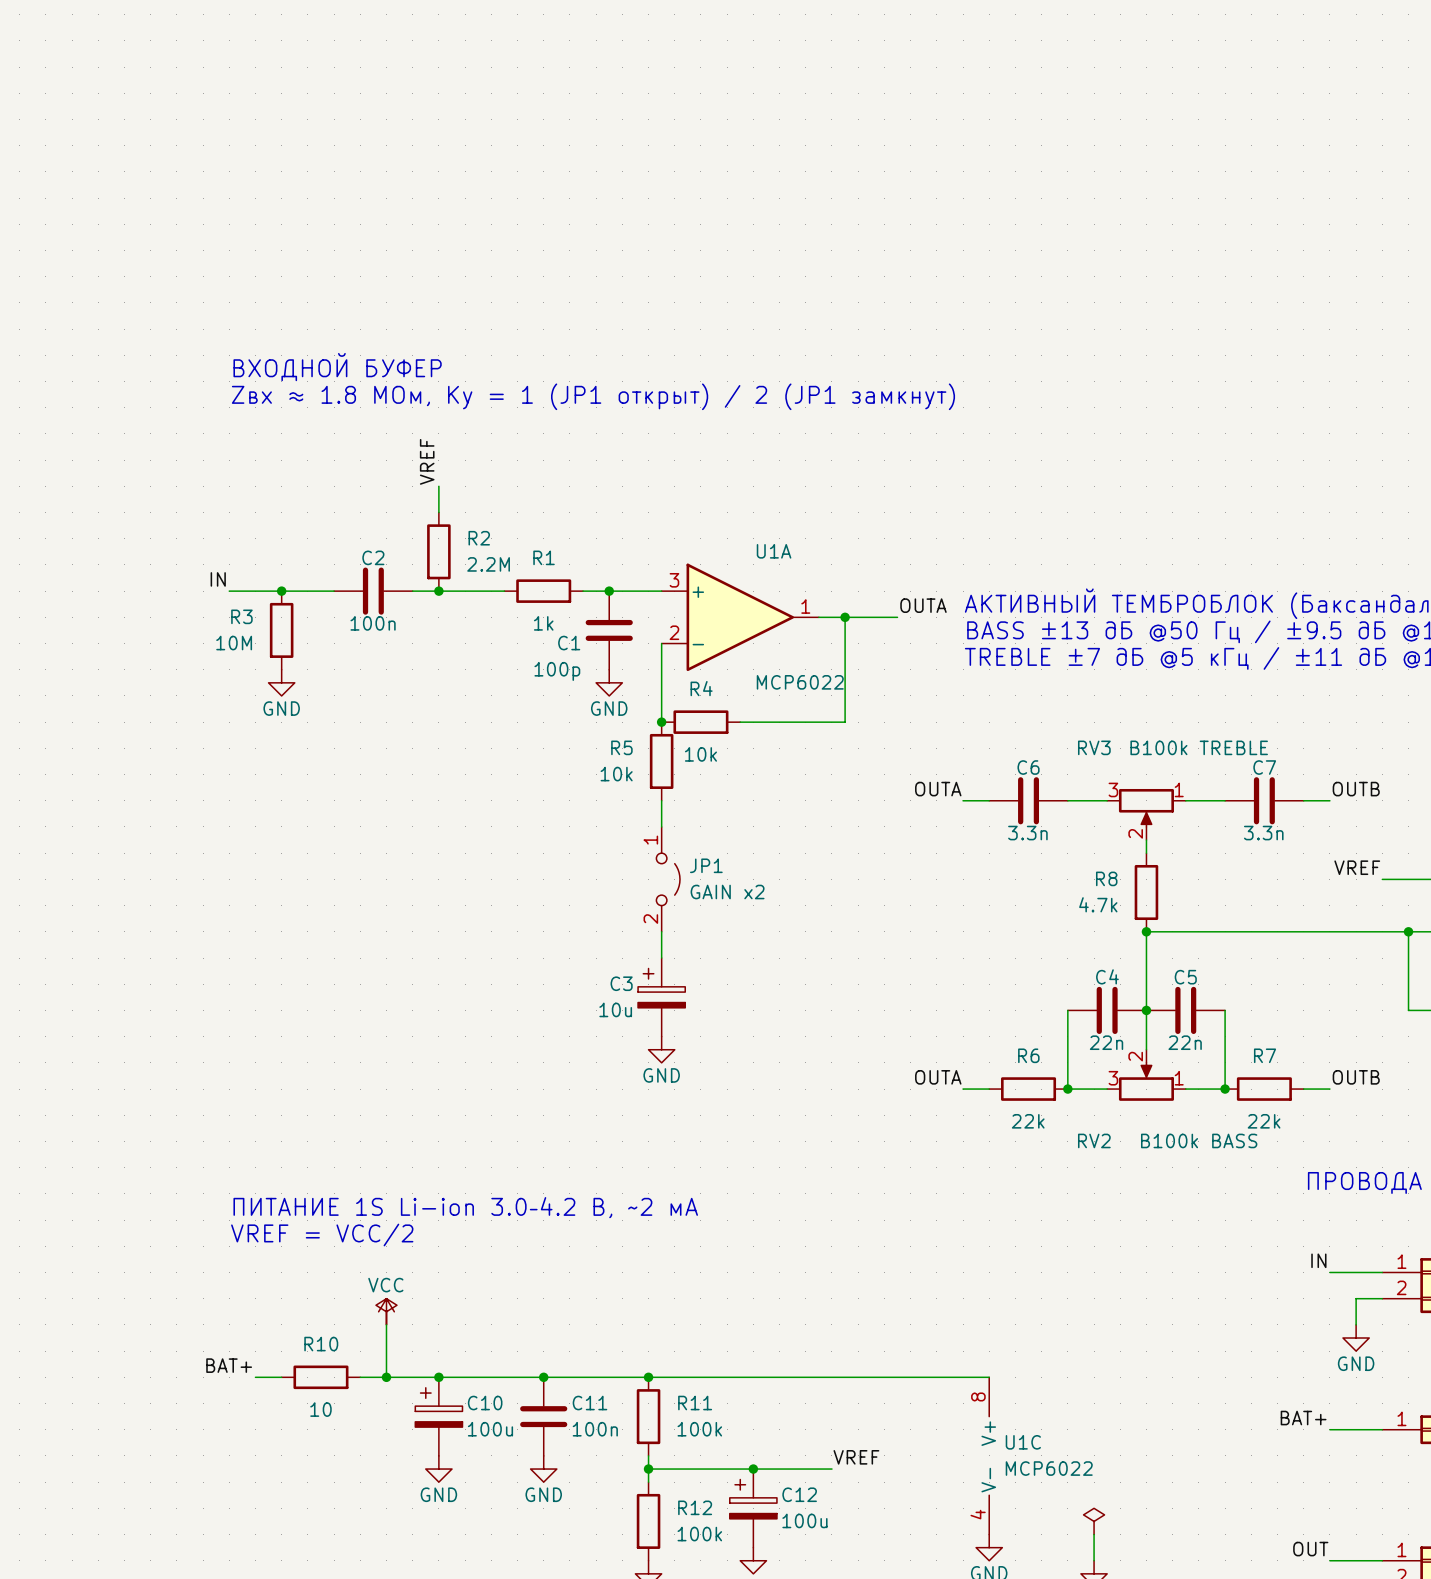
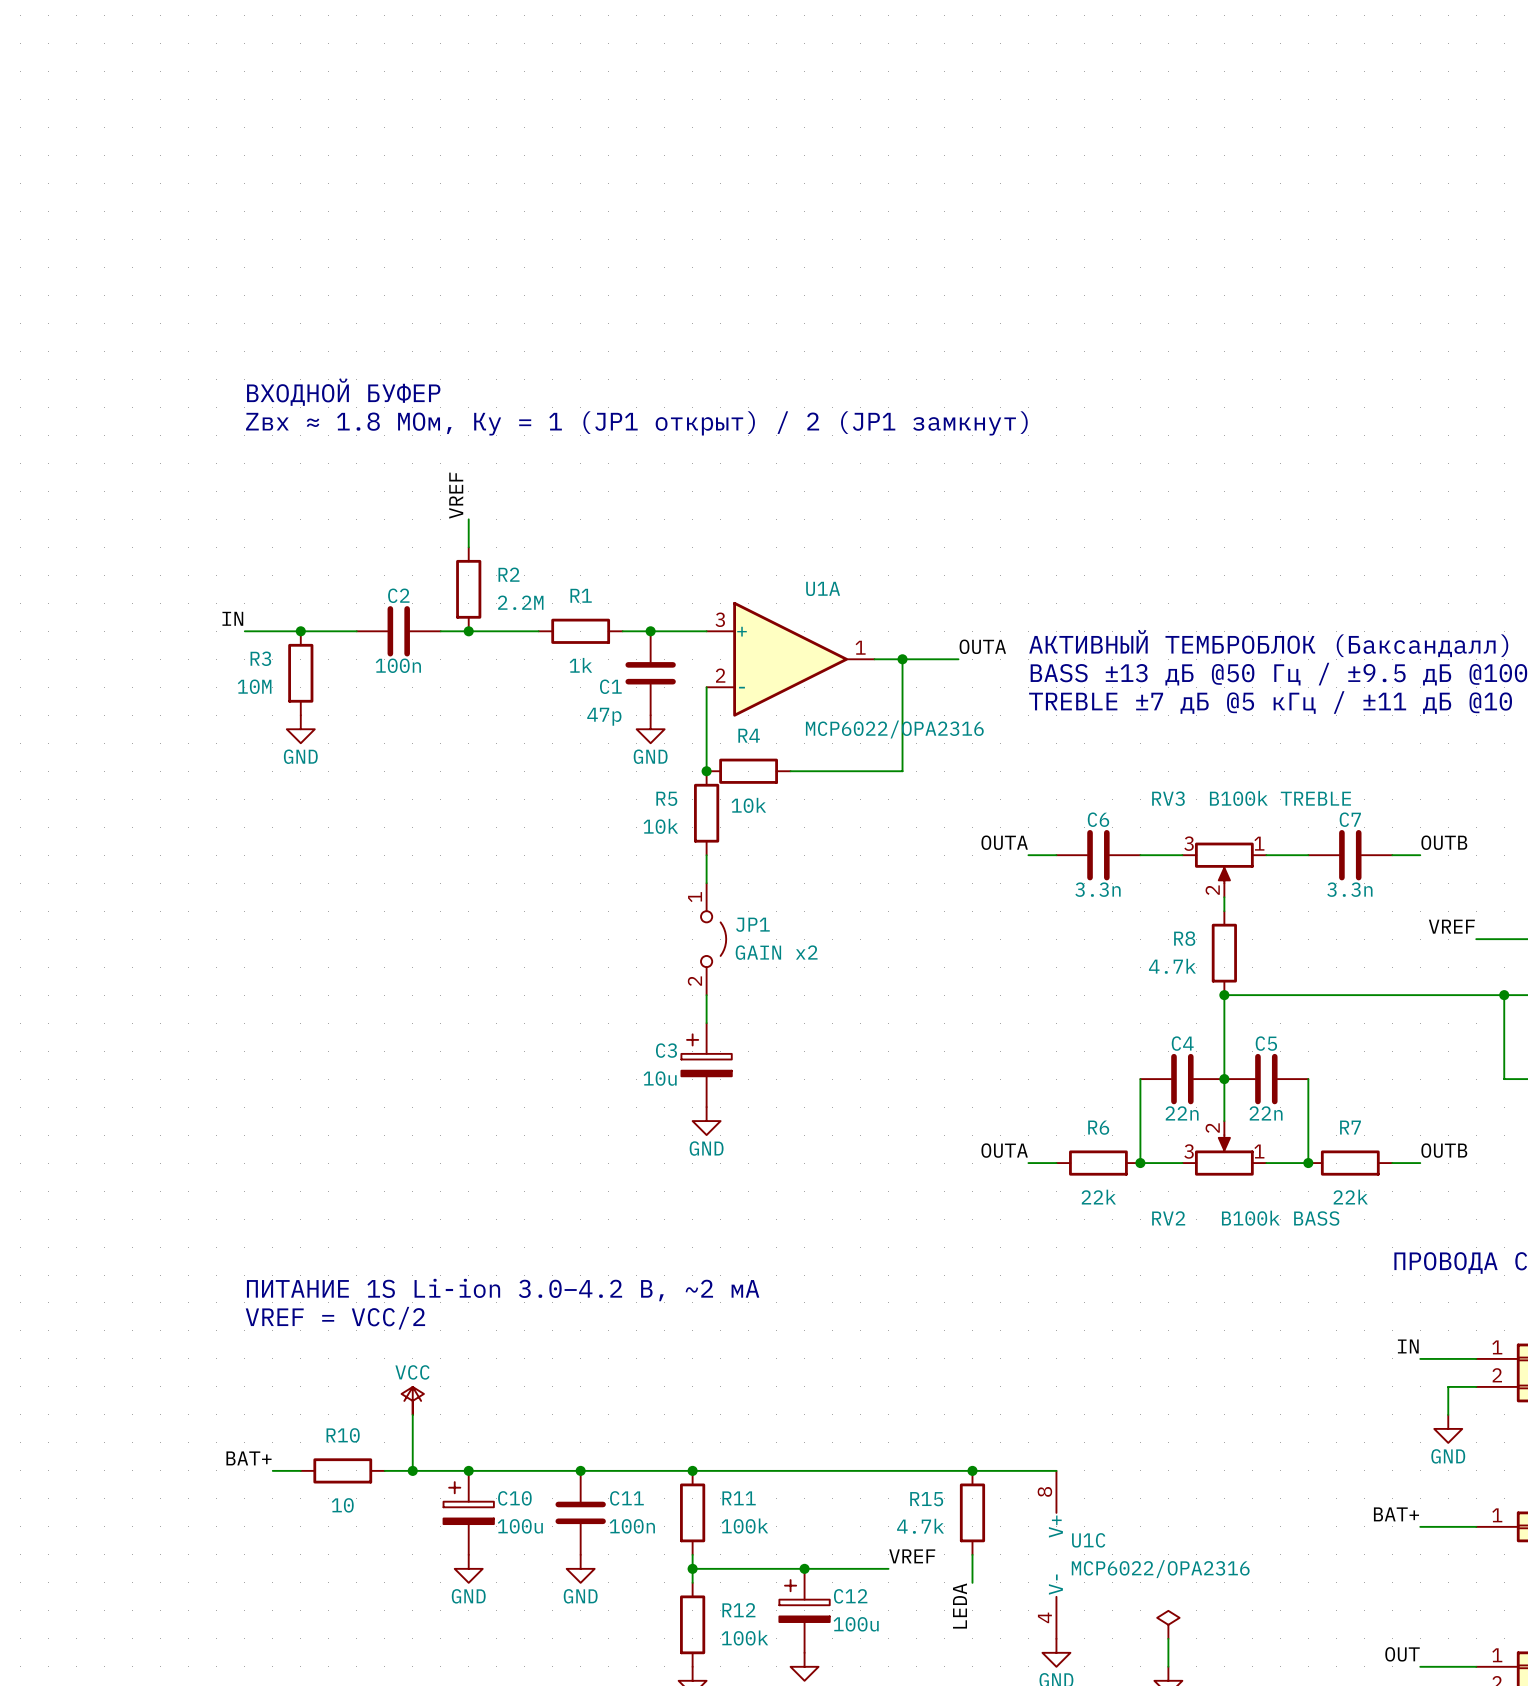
C1 value: 100p (557, 671) -> 47p (604, 716)
U1A value: MCP6022 (800, 682) -> MCP6022/OPA2316 (894, 729)
junction: none -> (972, 1470)
R15: none -> 4.7k (972, 1512)
wire: none -> (972, 1554) (972, 1582)
U1C value: MCP6022 (1049, 1468) -> MCP6022/OPA2316 (1160, 1569)
label: none -> LEDA (960, 1606)

